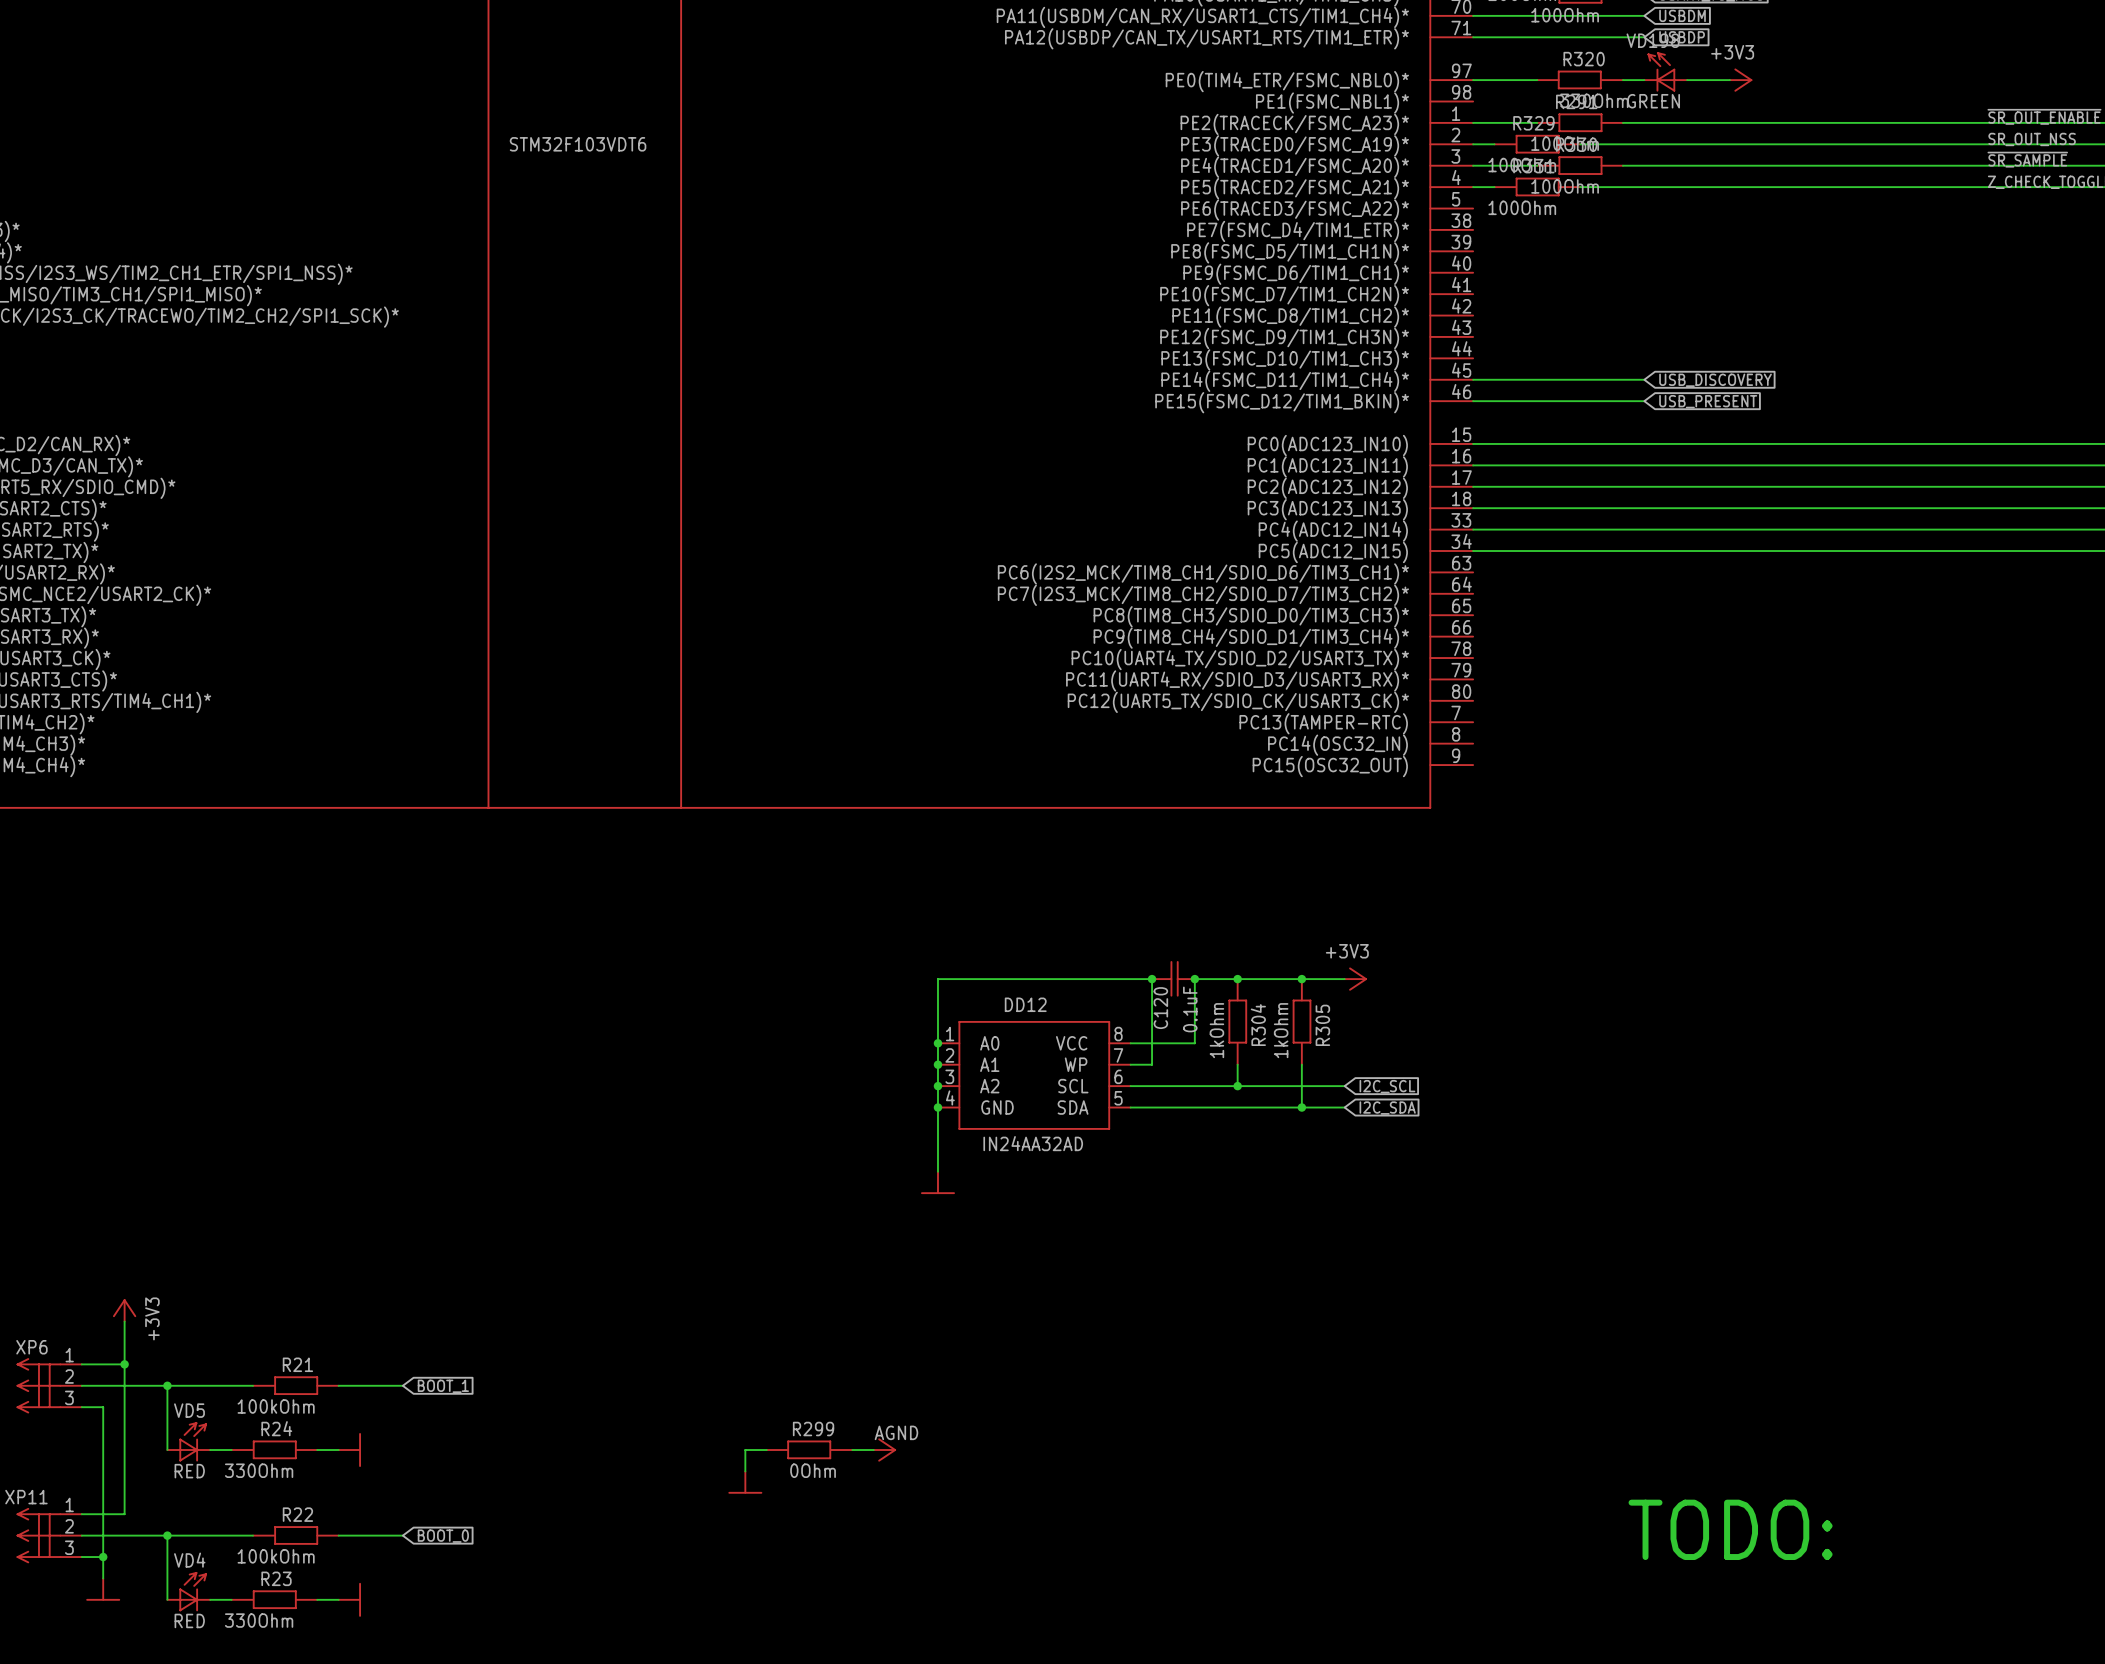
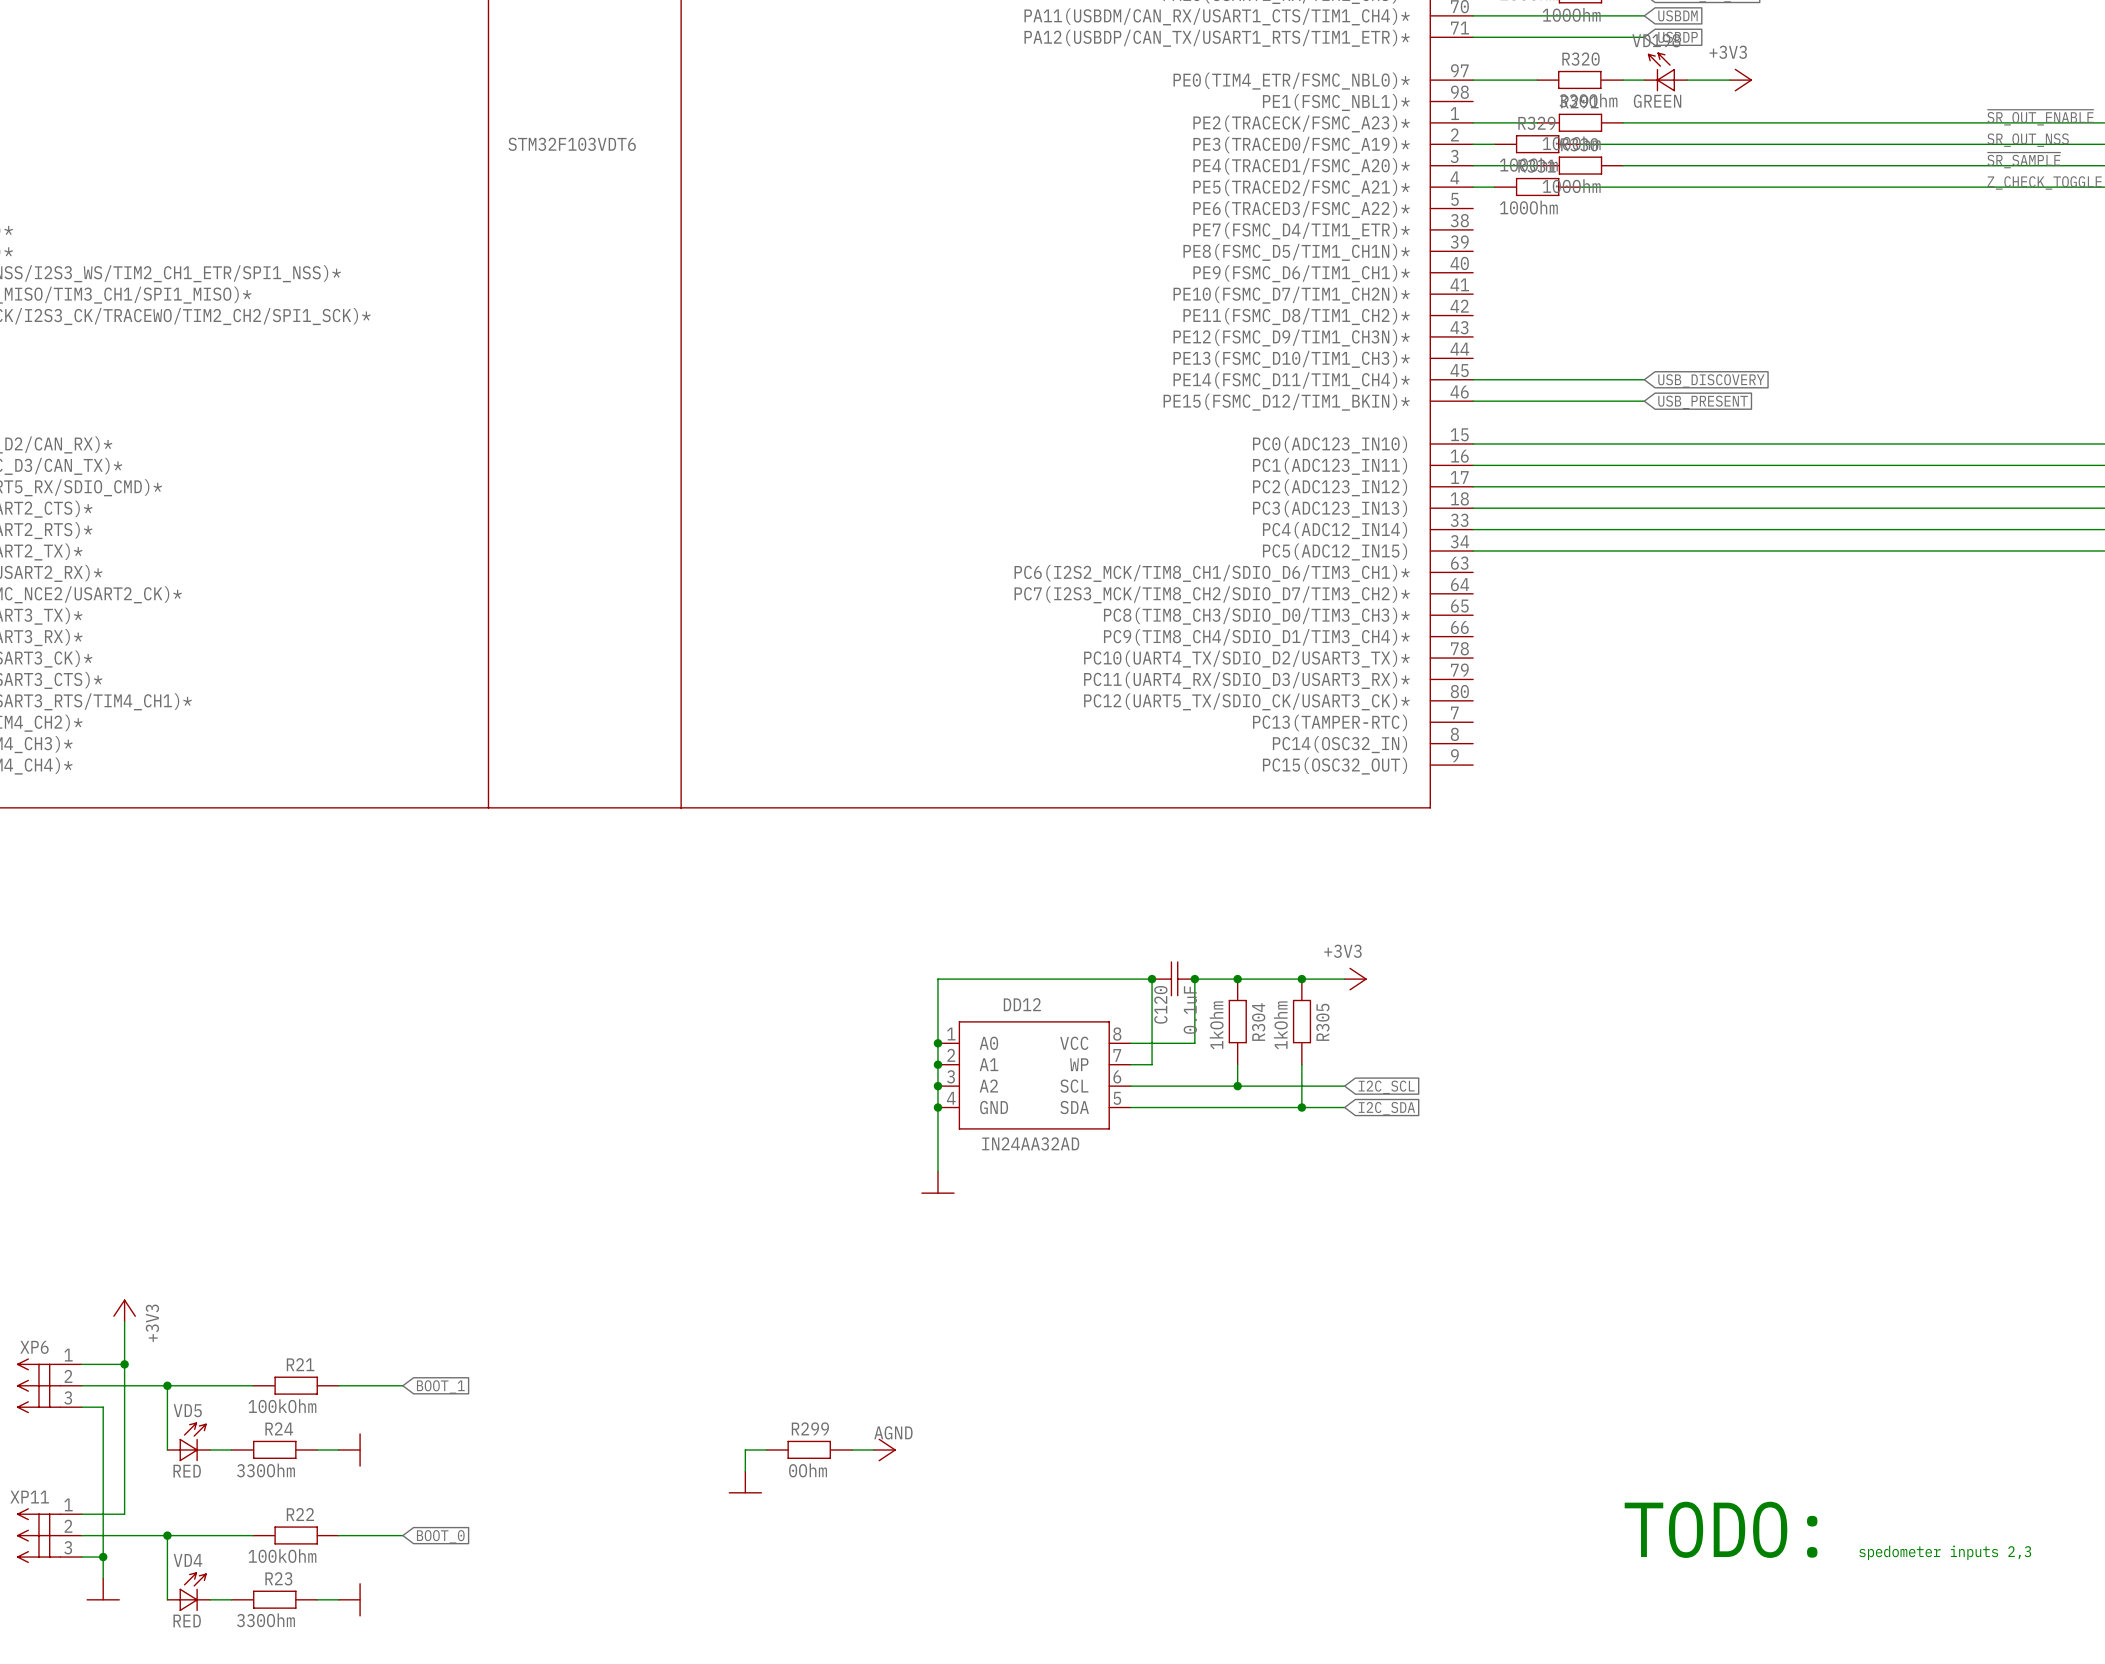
text: none -> spedometer inputs 2,3 (1945, 1552)

